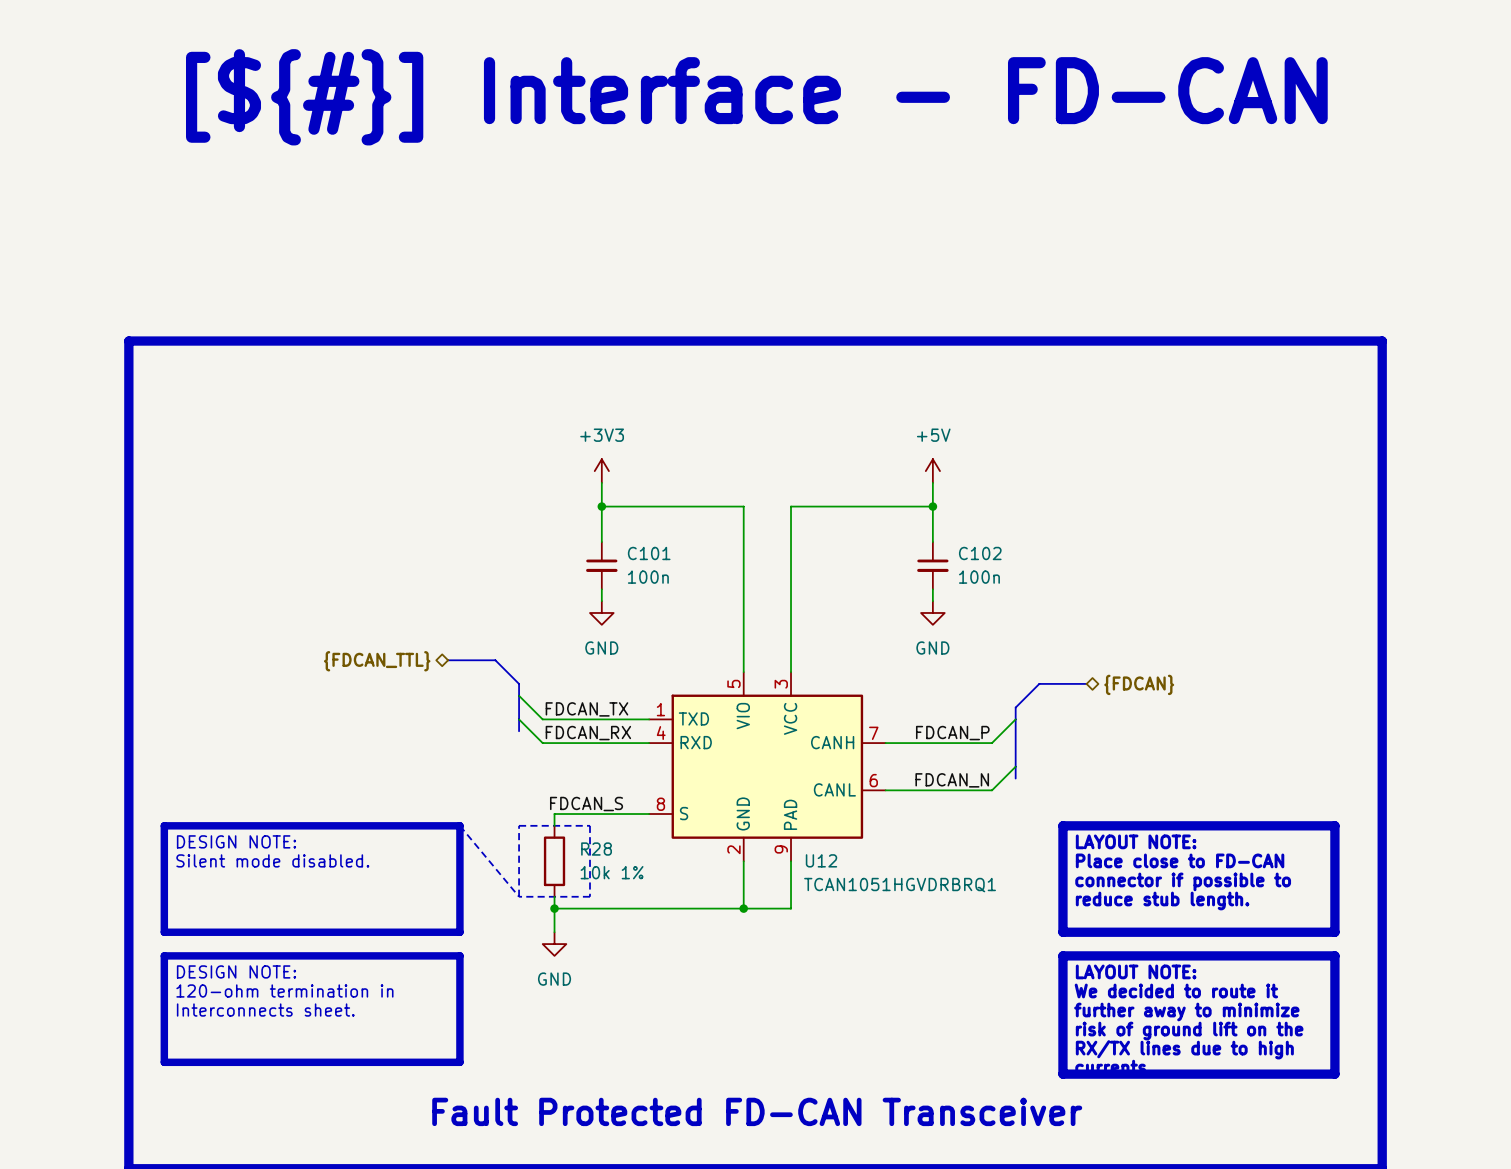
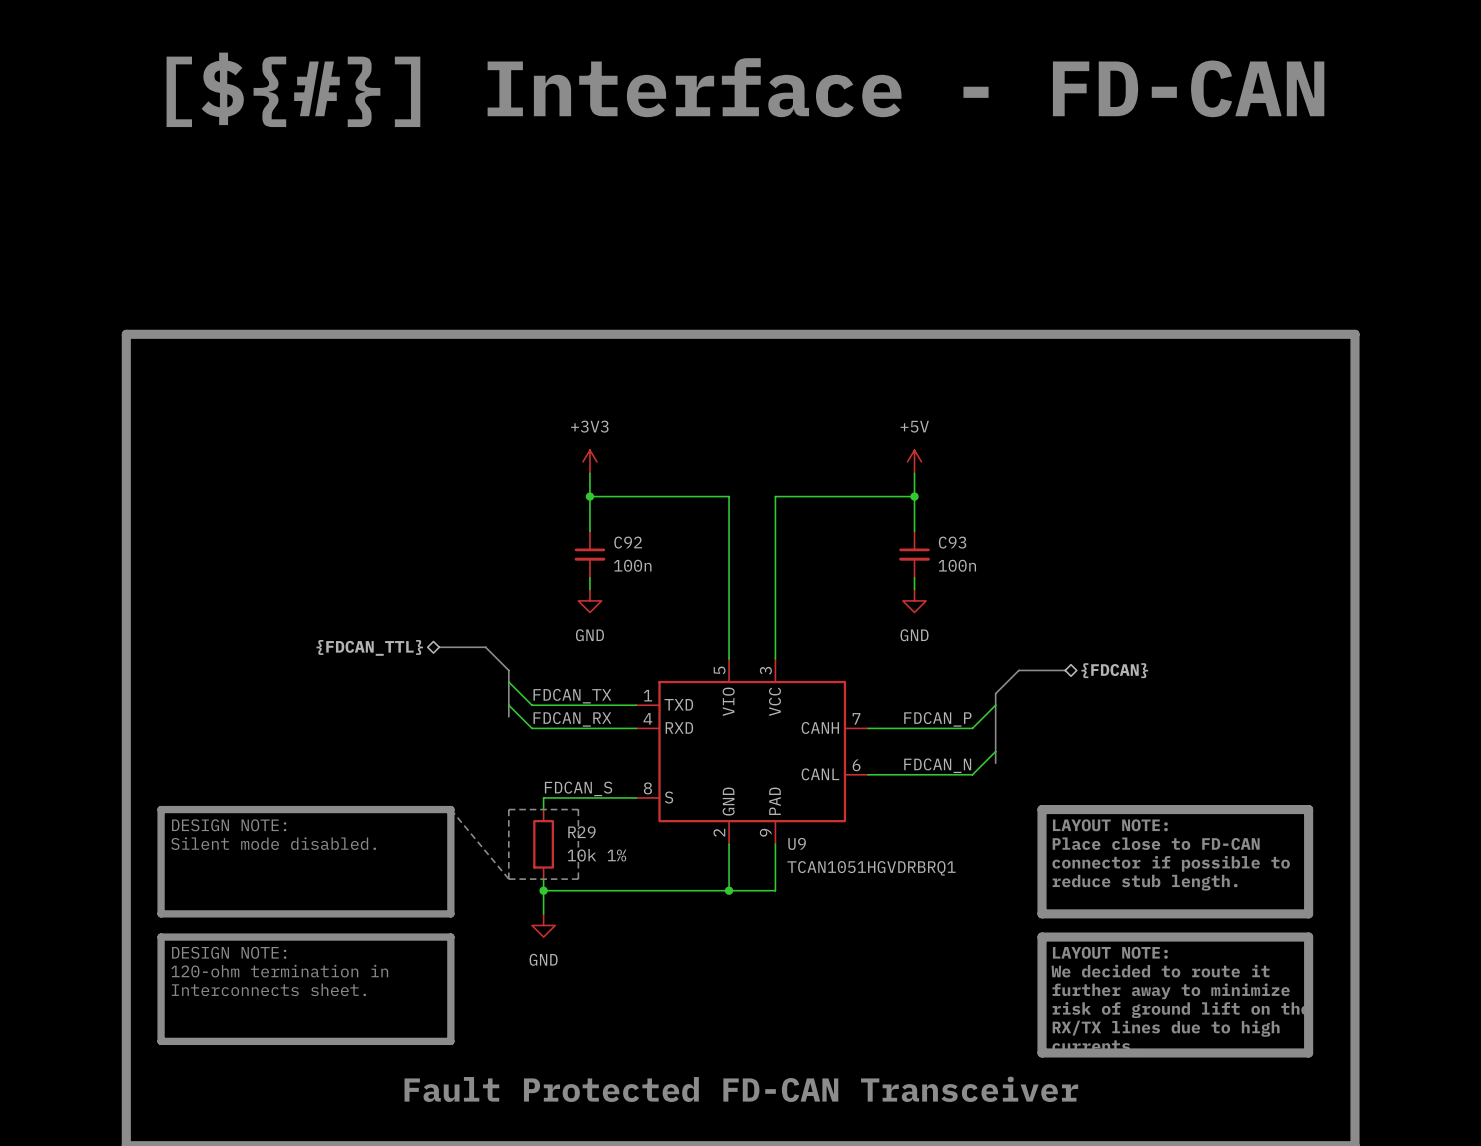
C101 name: C101 (649, 553) -> C92 (628, 542)
C102 name: C102 (980, 553) -> C93 (952, 542)
R28 name: R28 (596, 849) -> R29 (581, 832)
U12 name: U12 (821, 860) -> U9 (797, 843)

